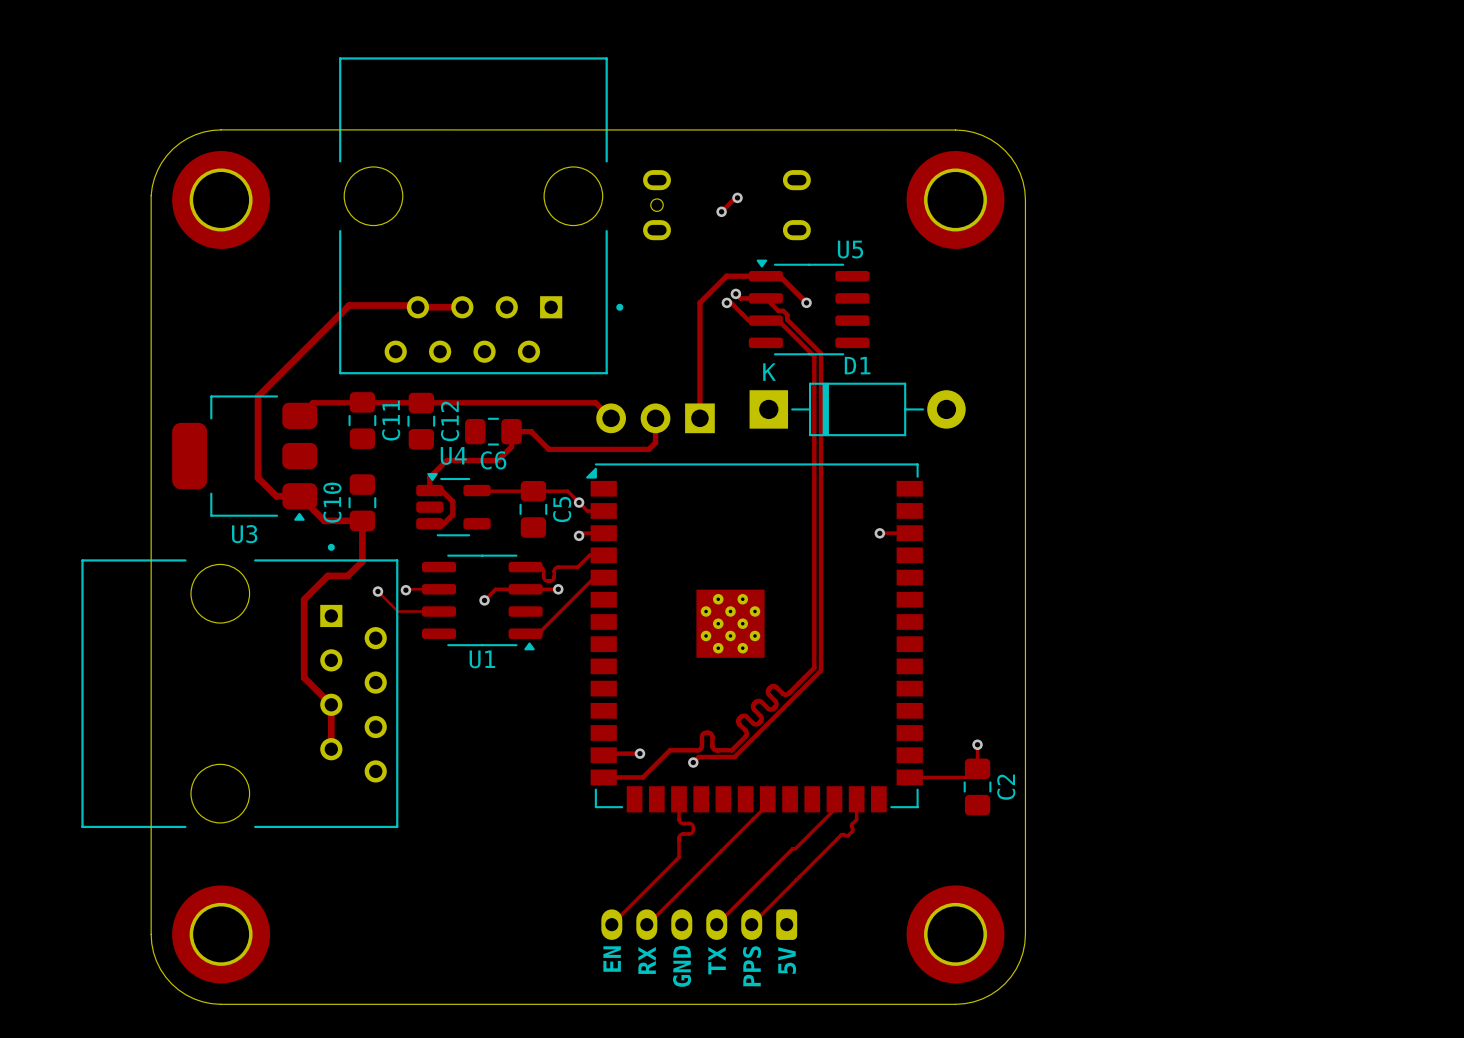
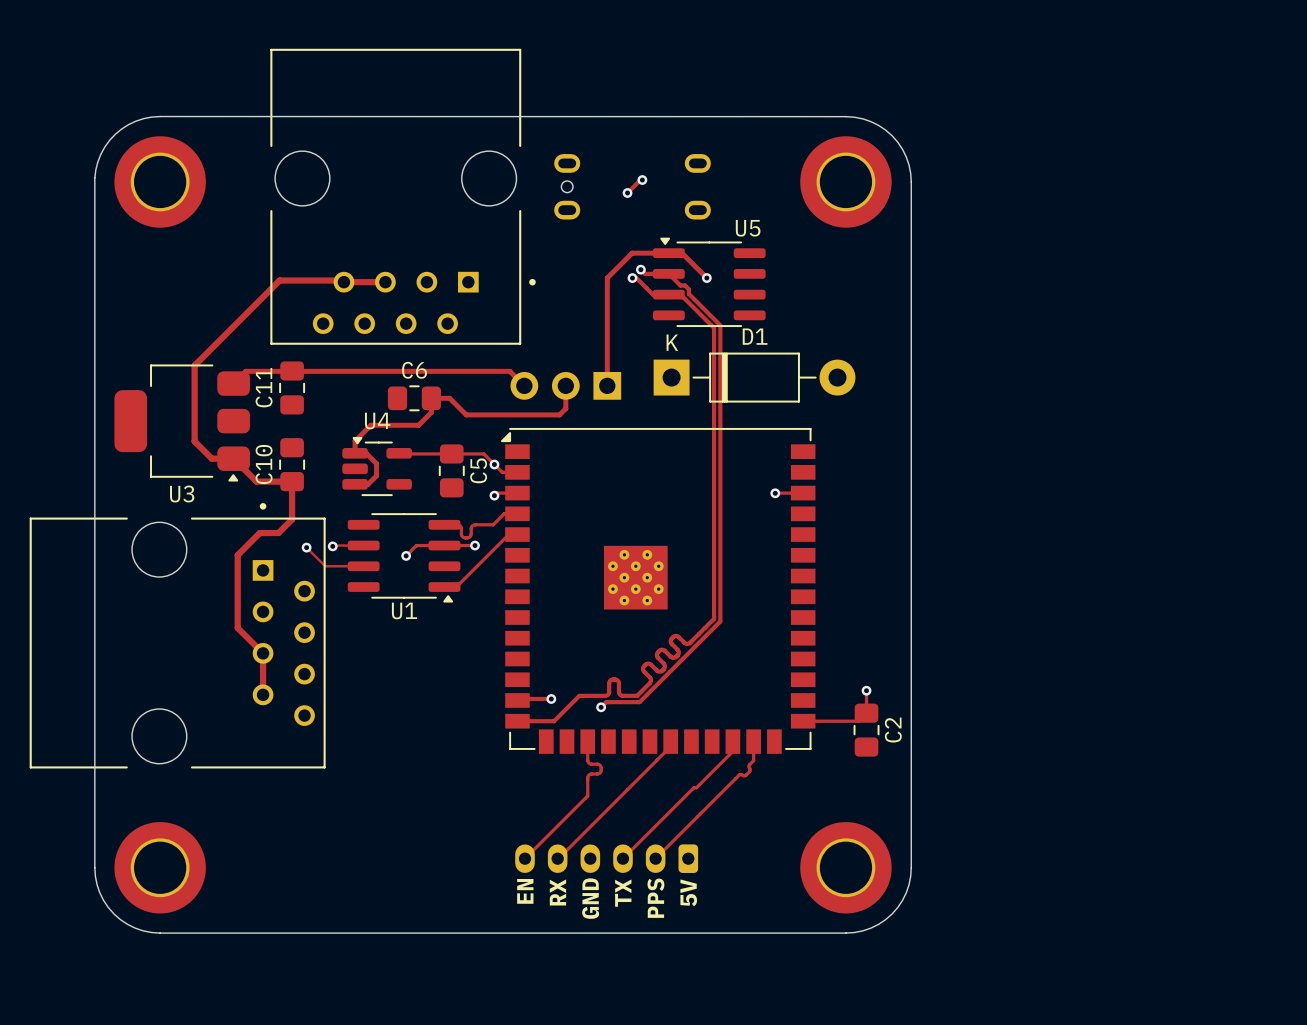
C11 name position: C11 (391, 420) -> C11 (264, 387)
C12: (421, 421) -> none
C6 name position: C6 (493, 460) -> C6 (414, 370)

